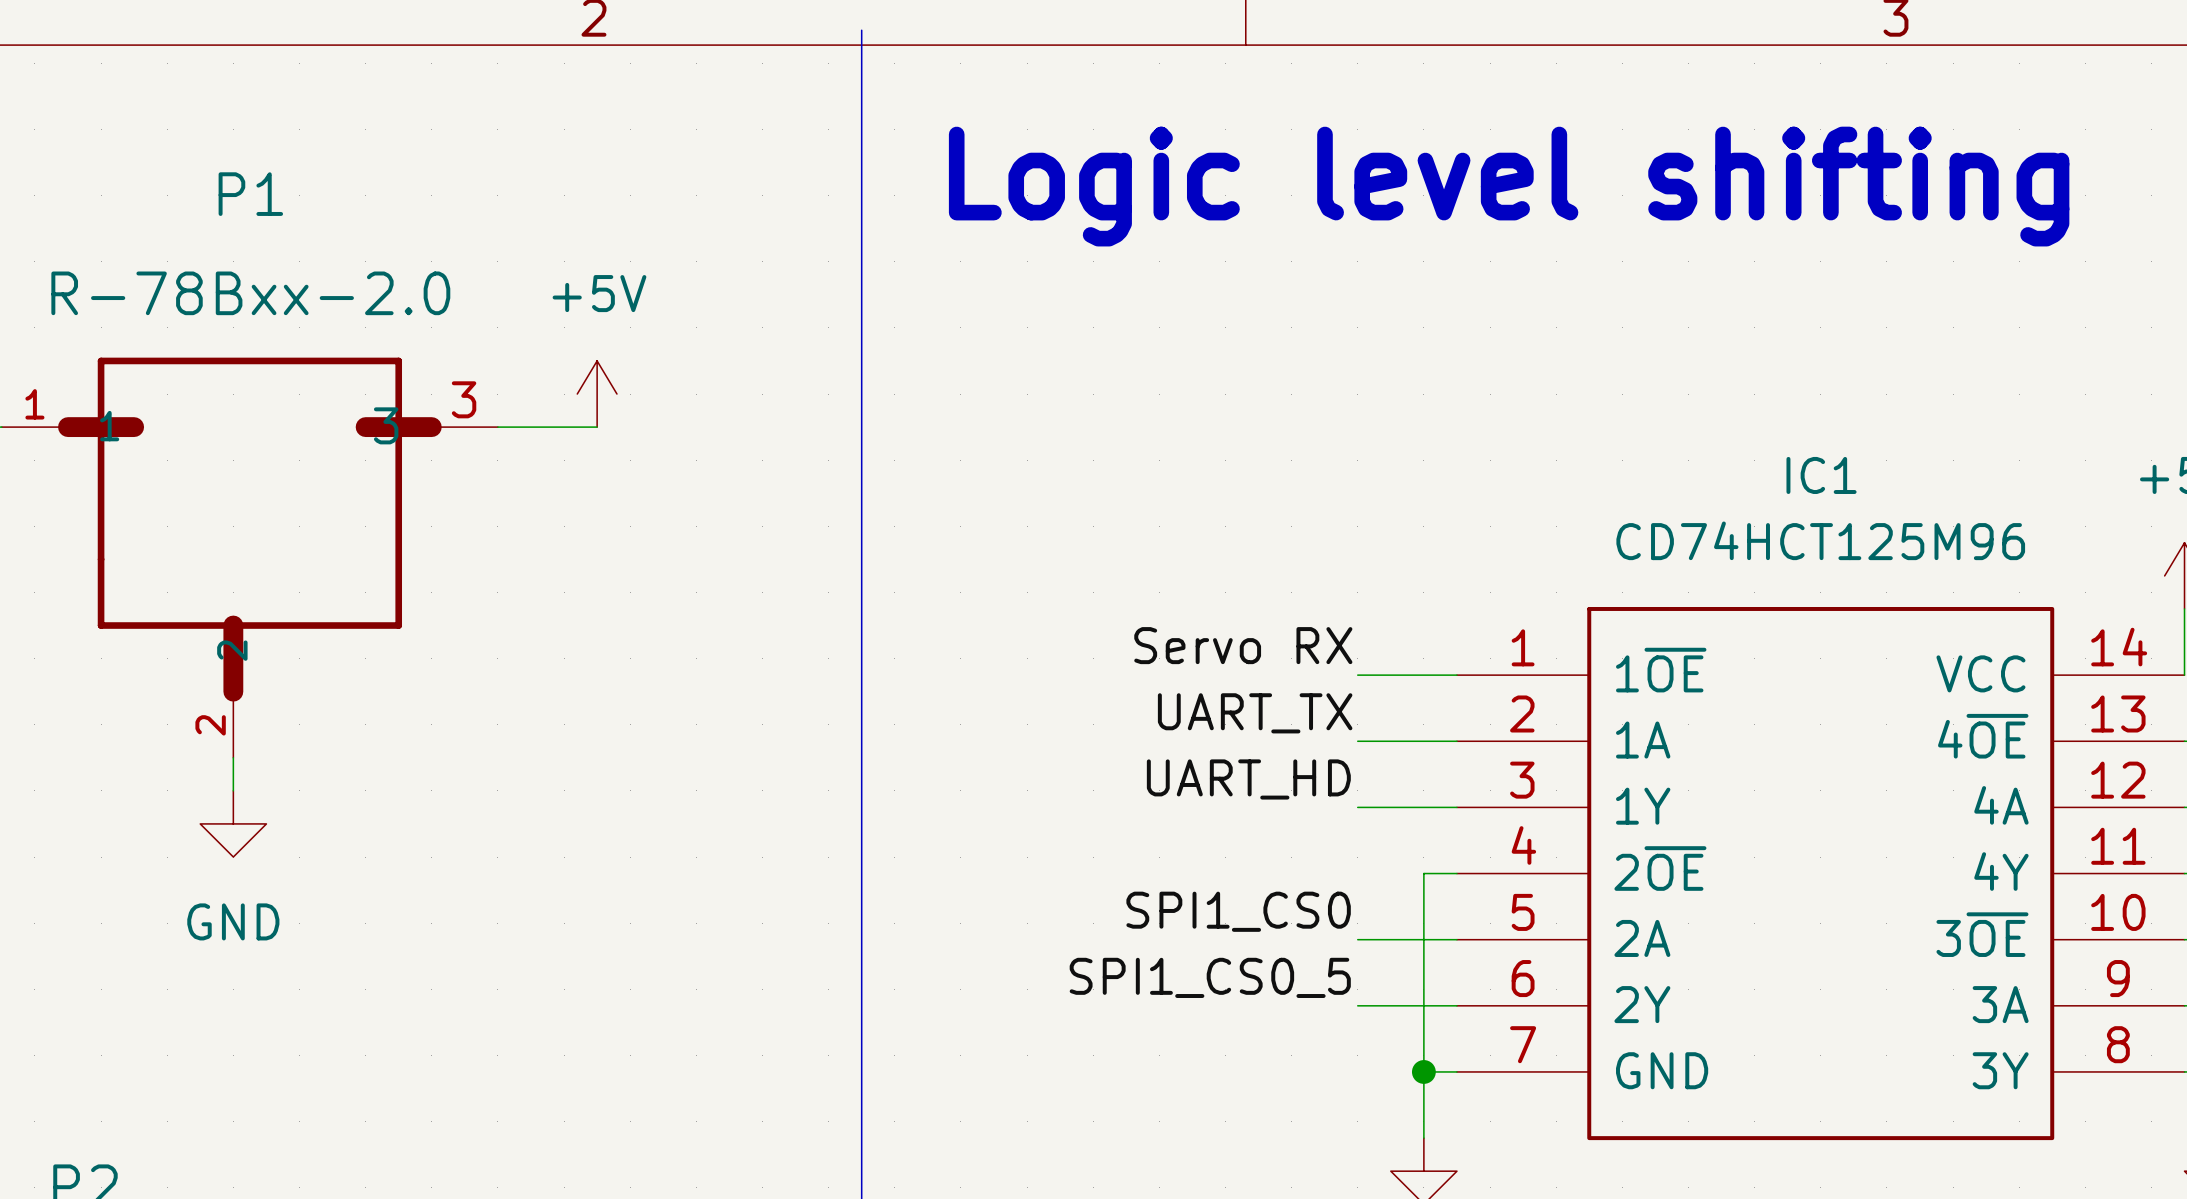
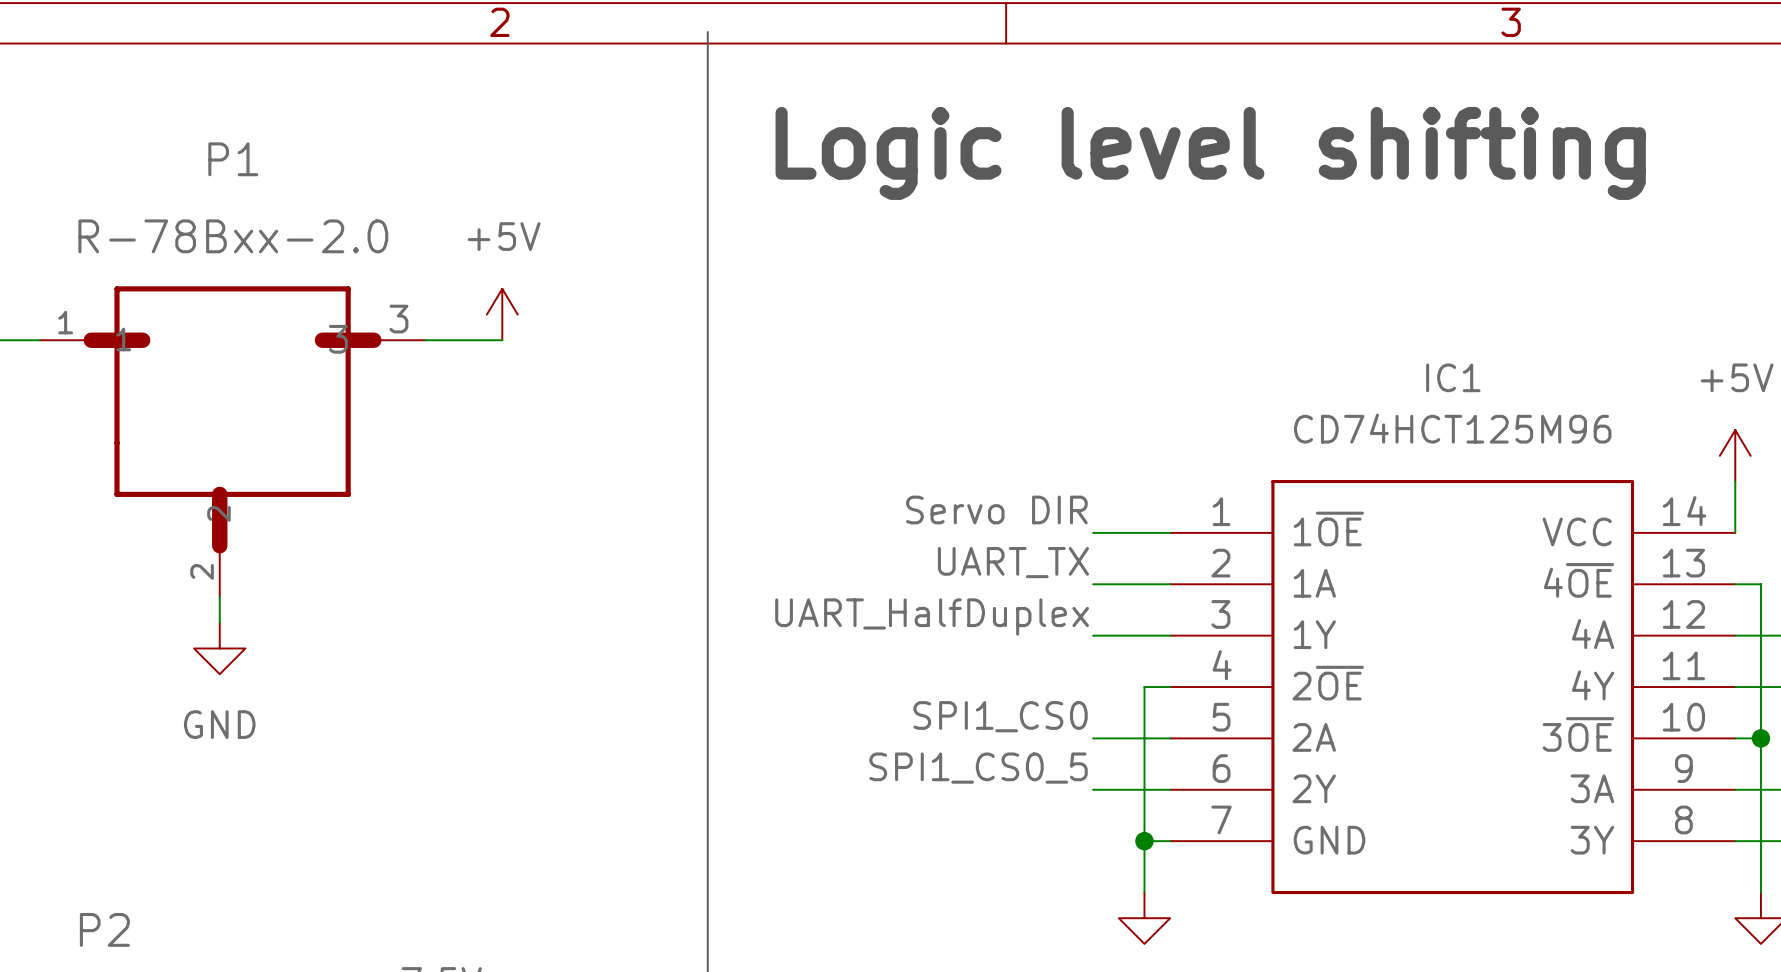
label: Servo RX (1243, 645) -> Servo DIR (996, 509)
label: UART_HD (1248, 779) -> UART_HalfDuplex (932, 617)

